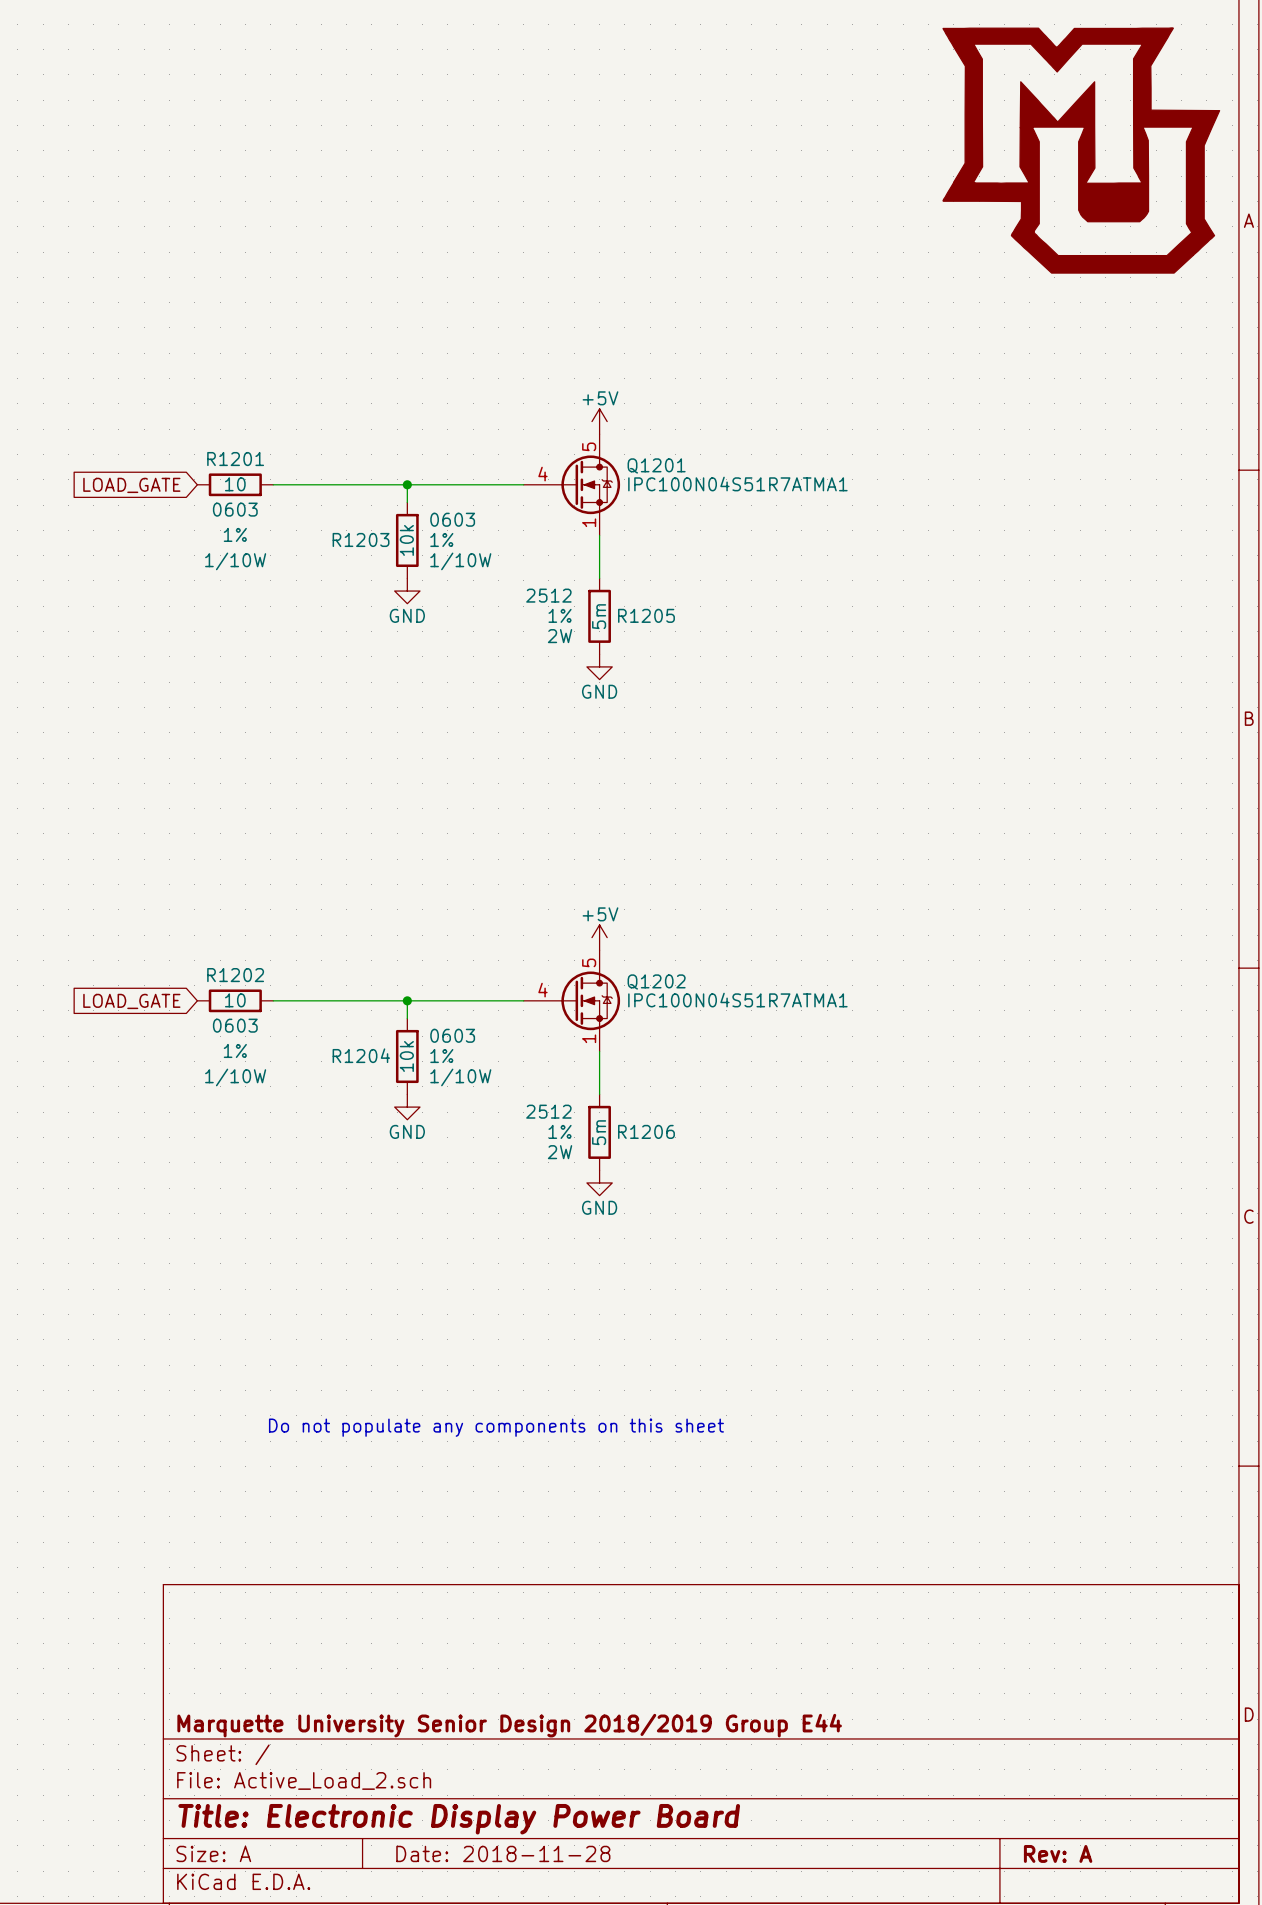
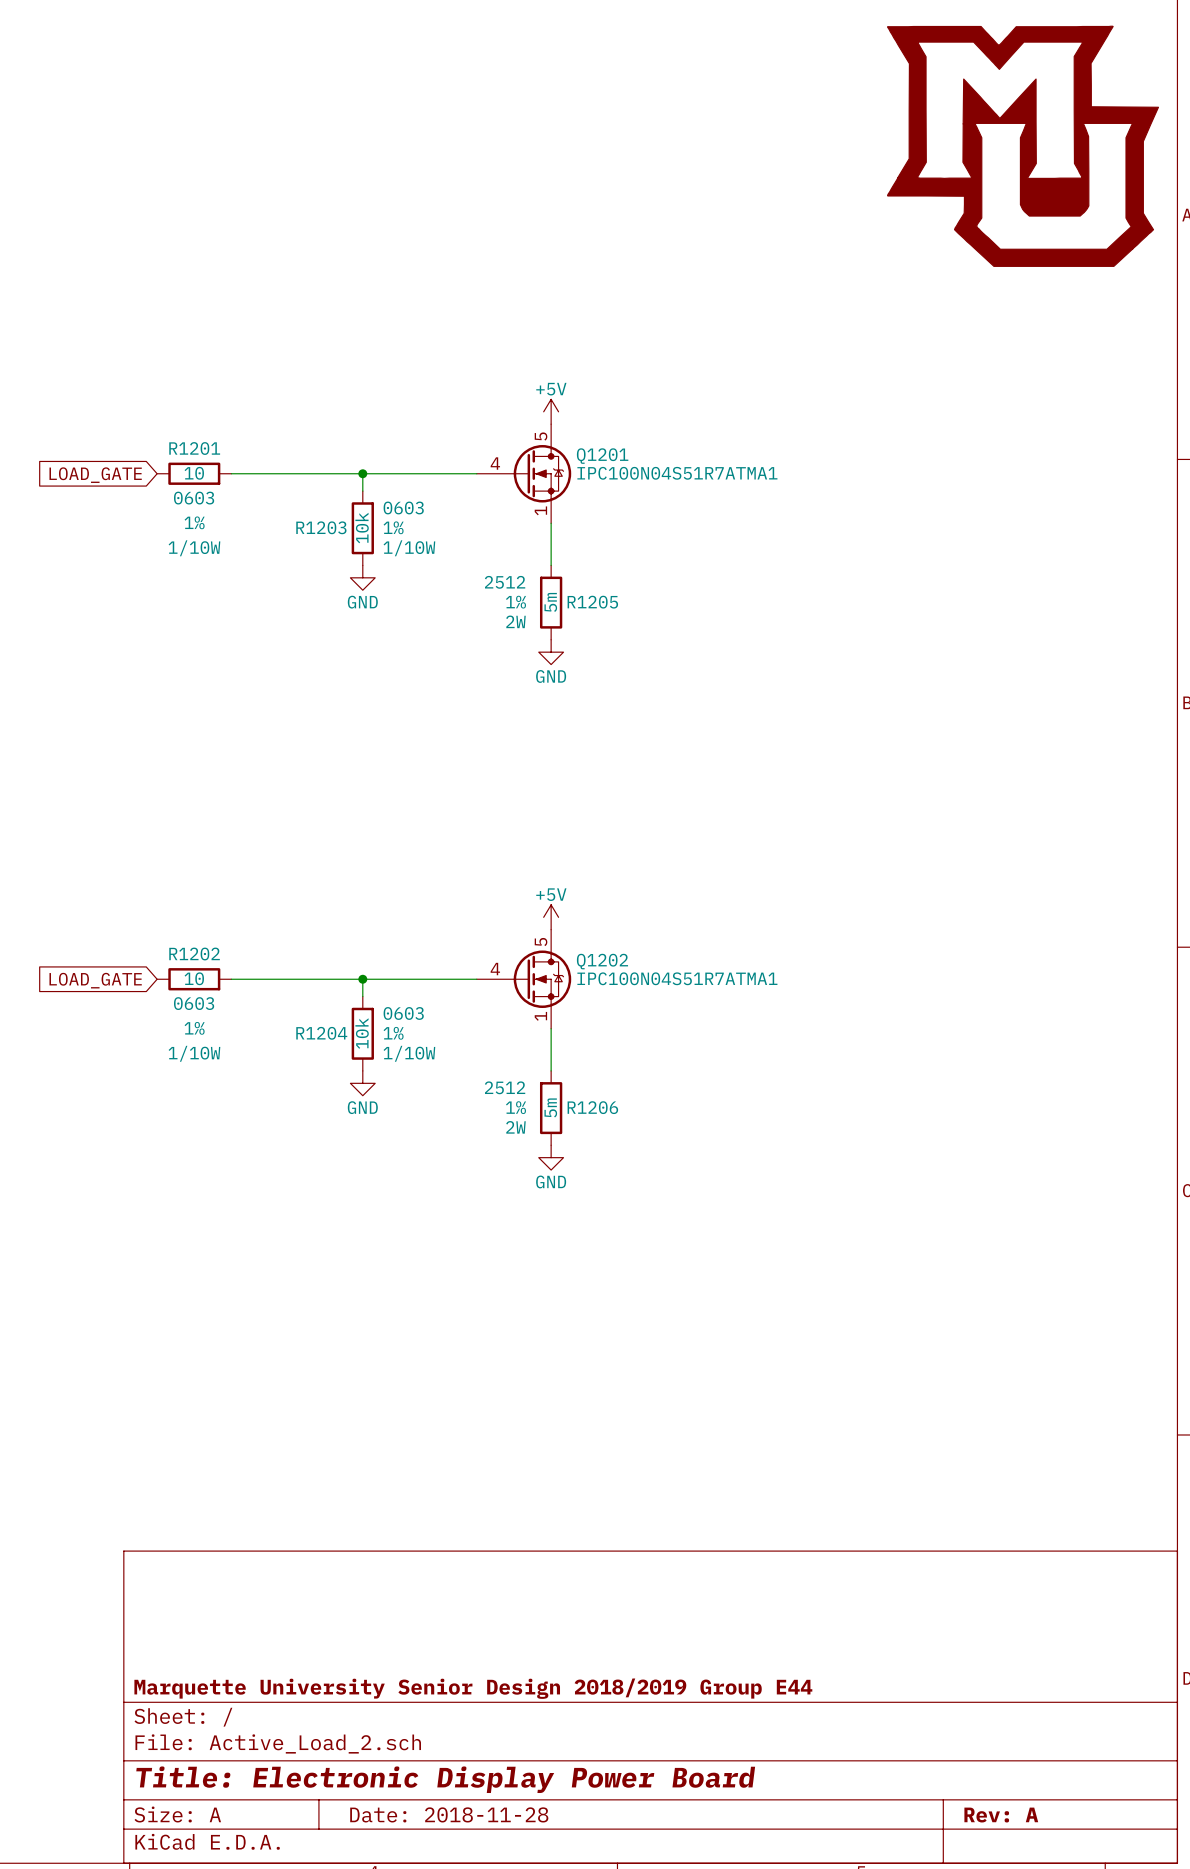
text: Do not populate any components on this sheet (496, 1427) -> none

